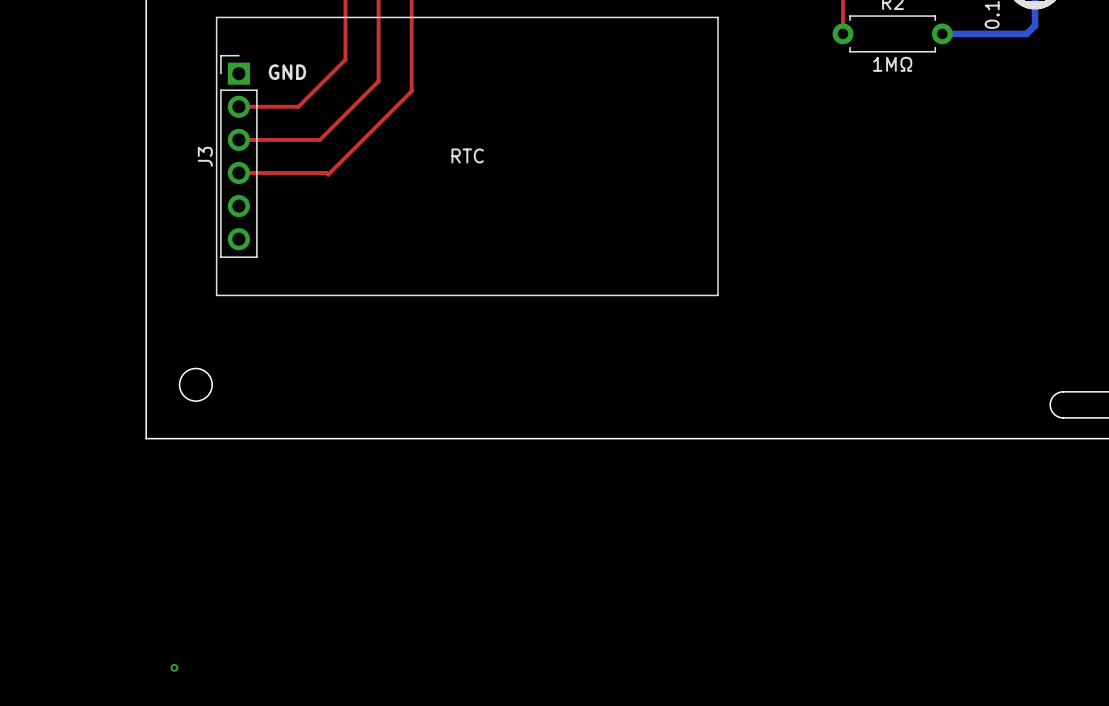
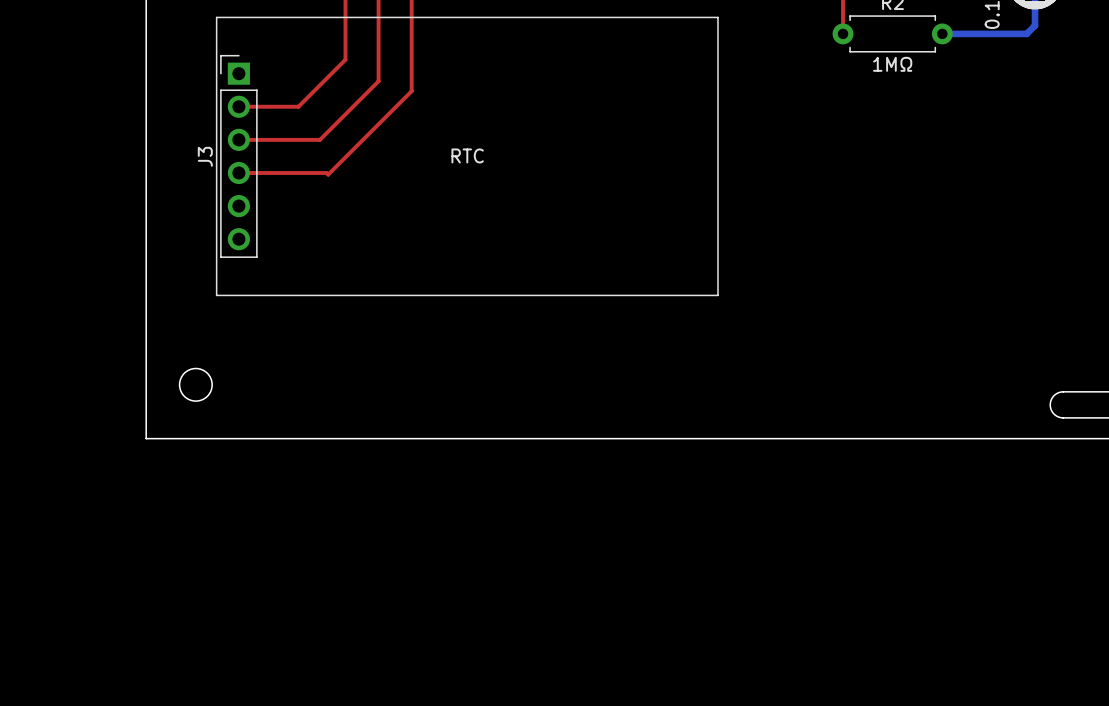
text: GND (287, 72) -> none
via: (174, 667) -> none

